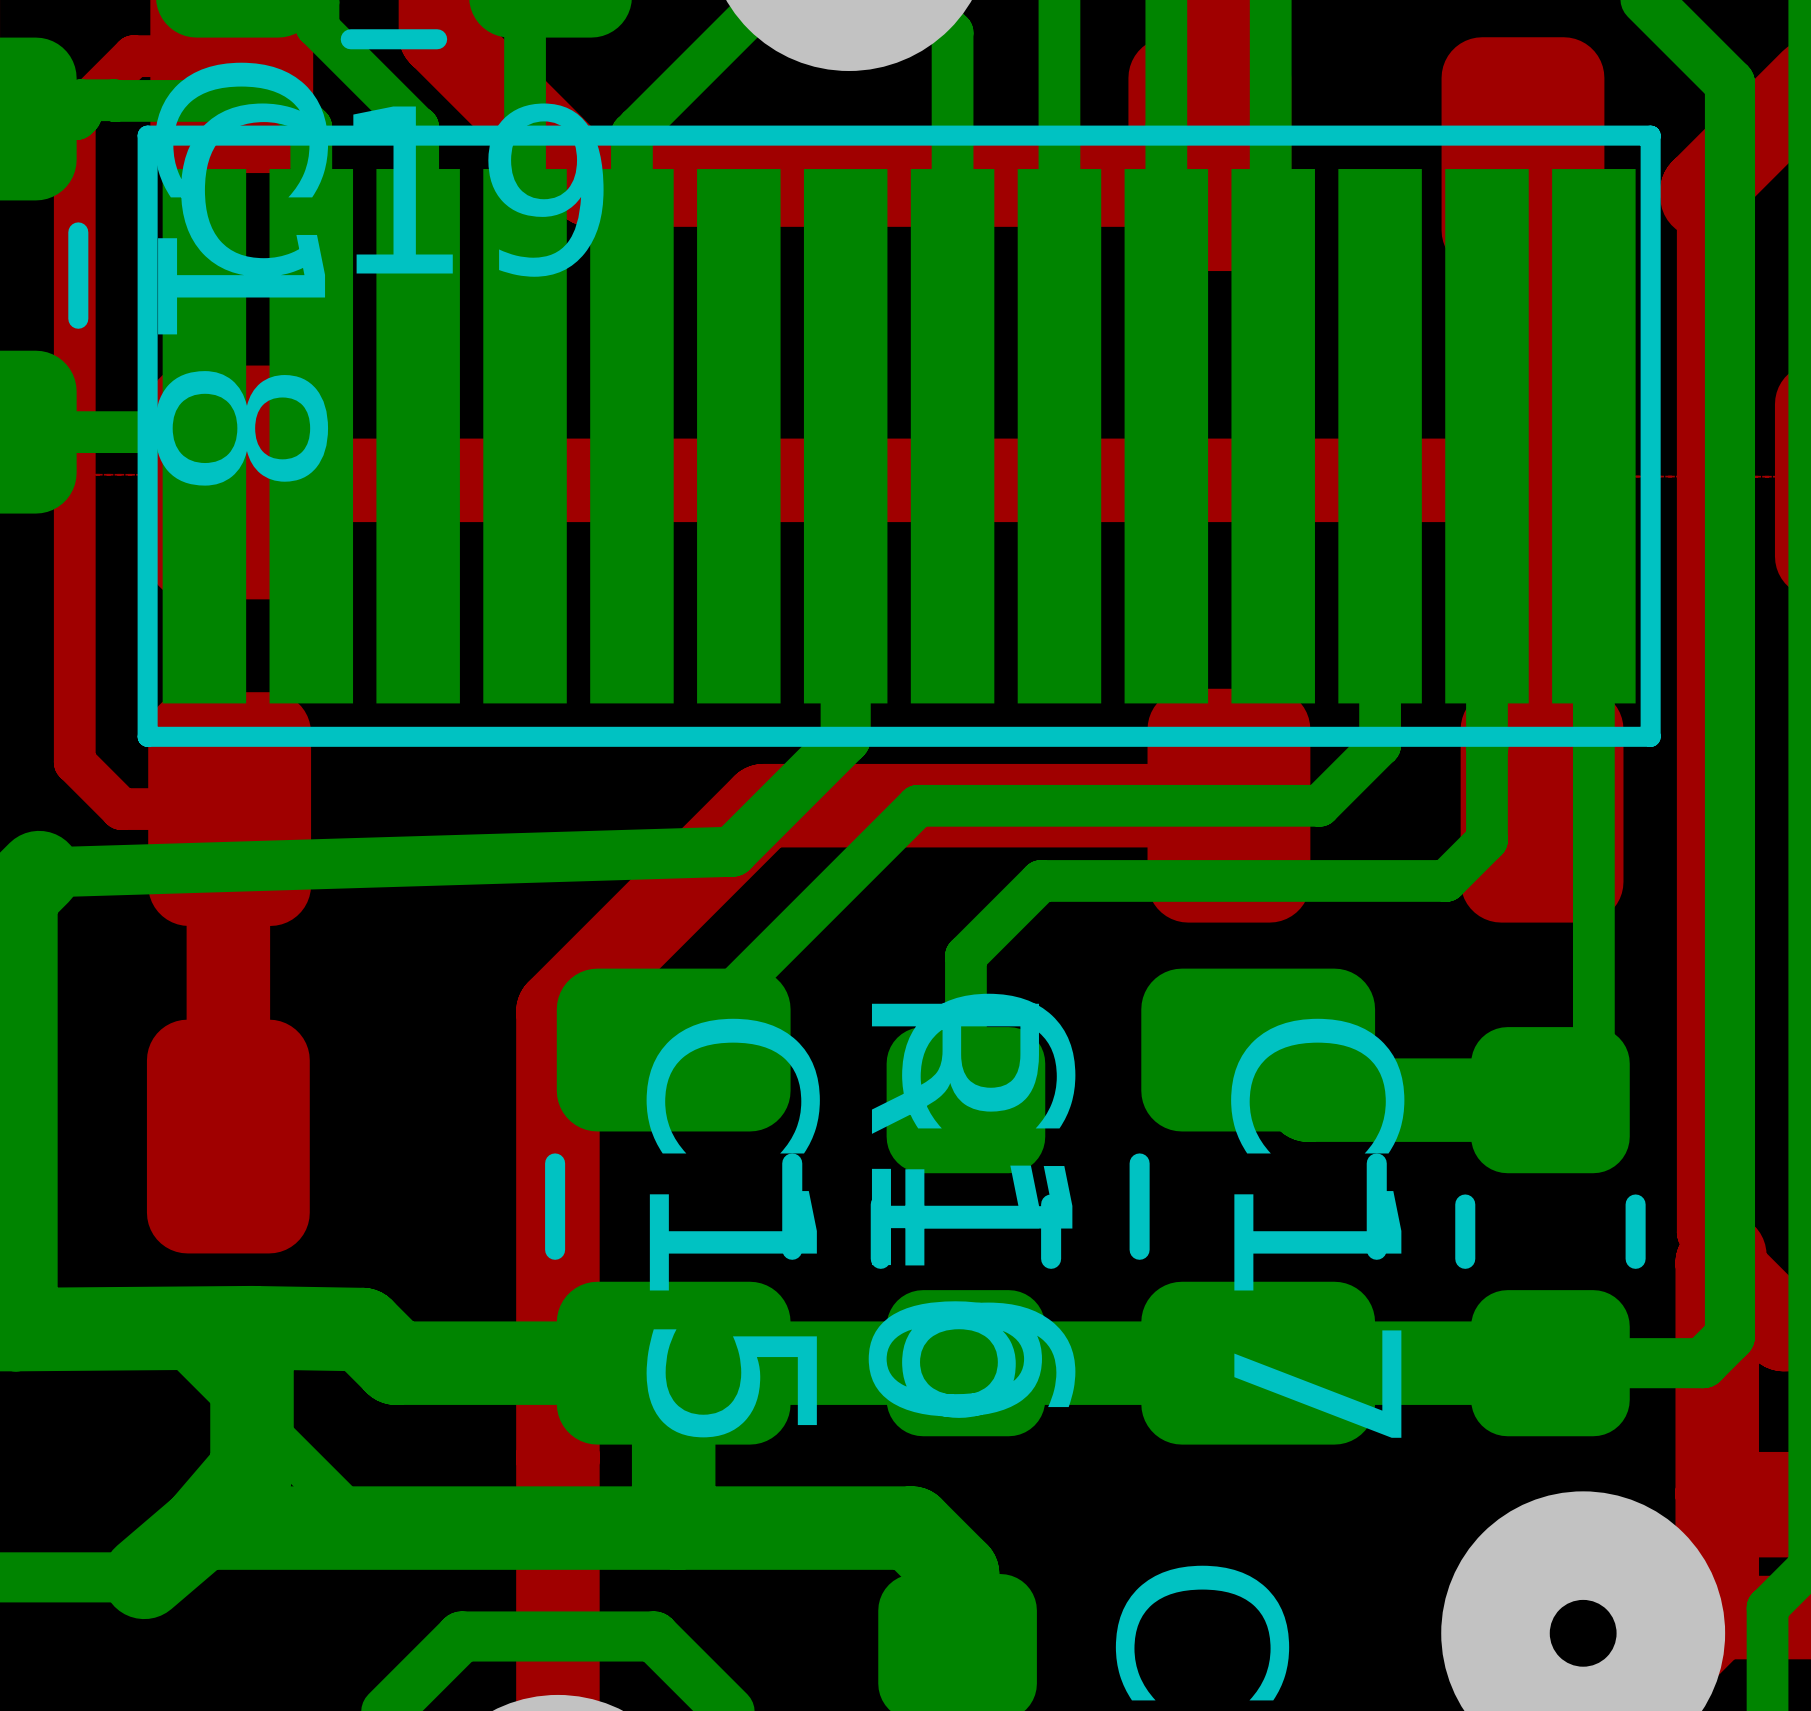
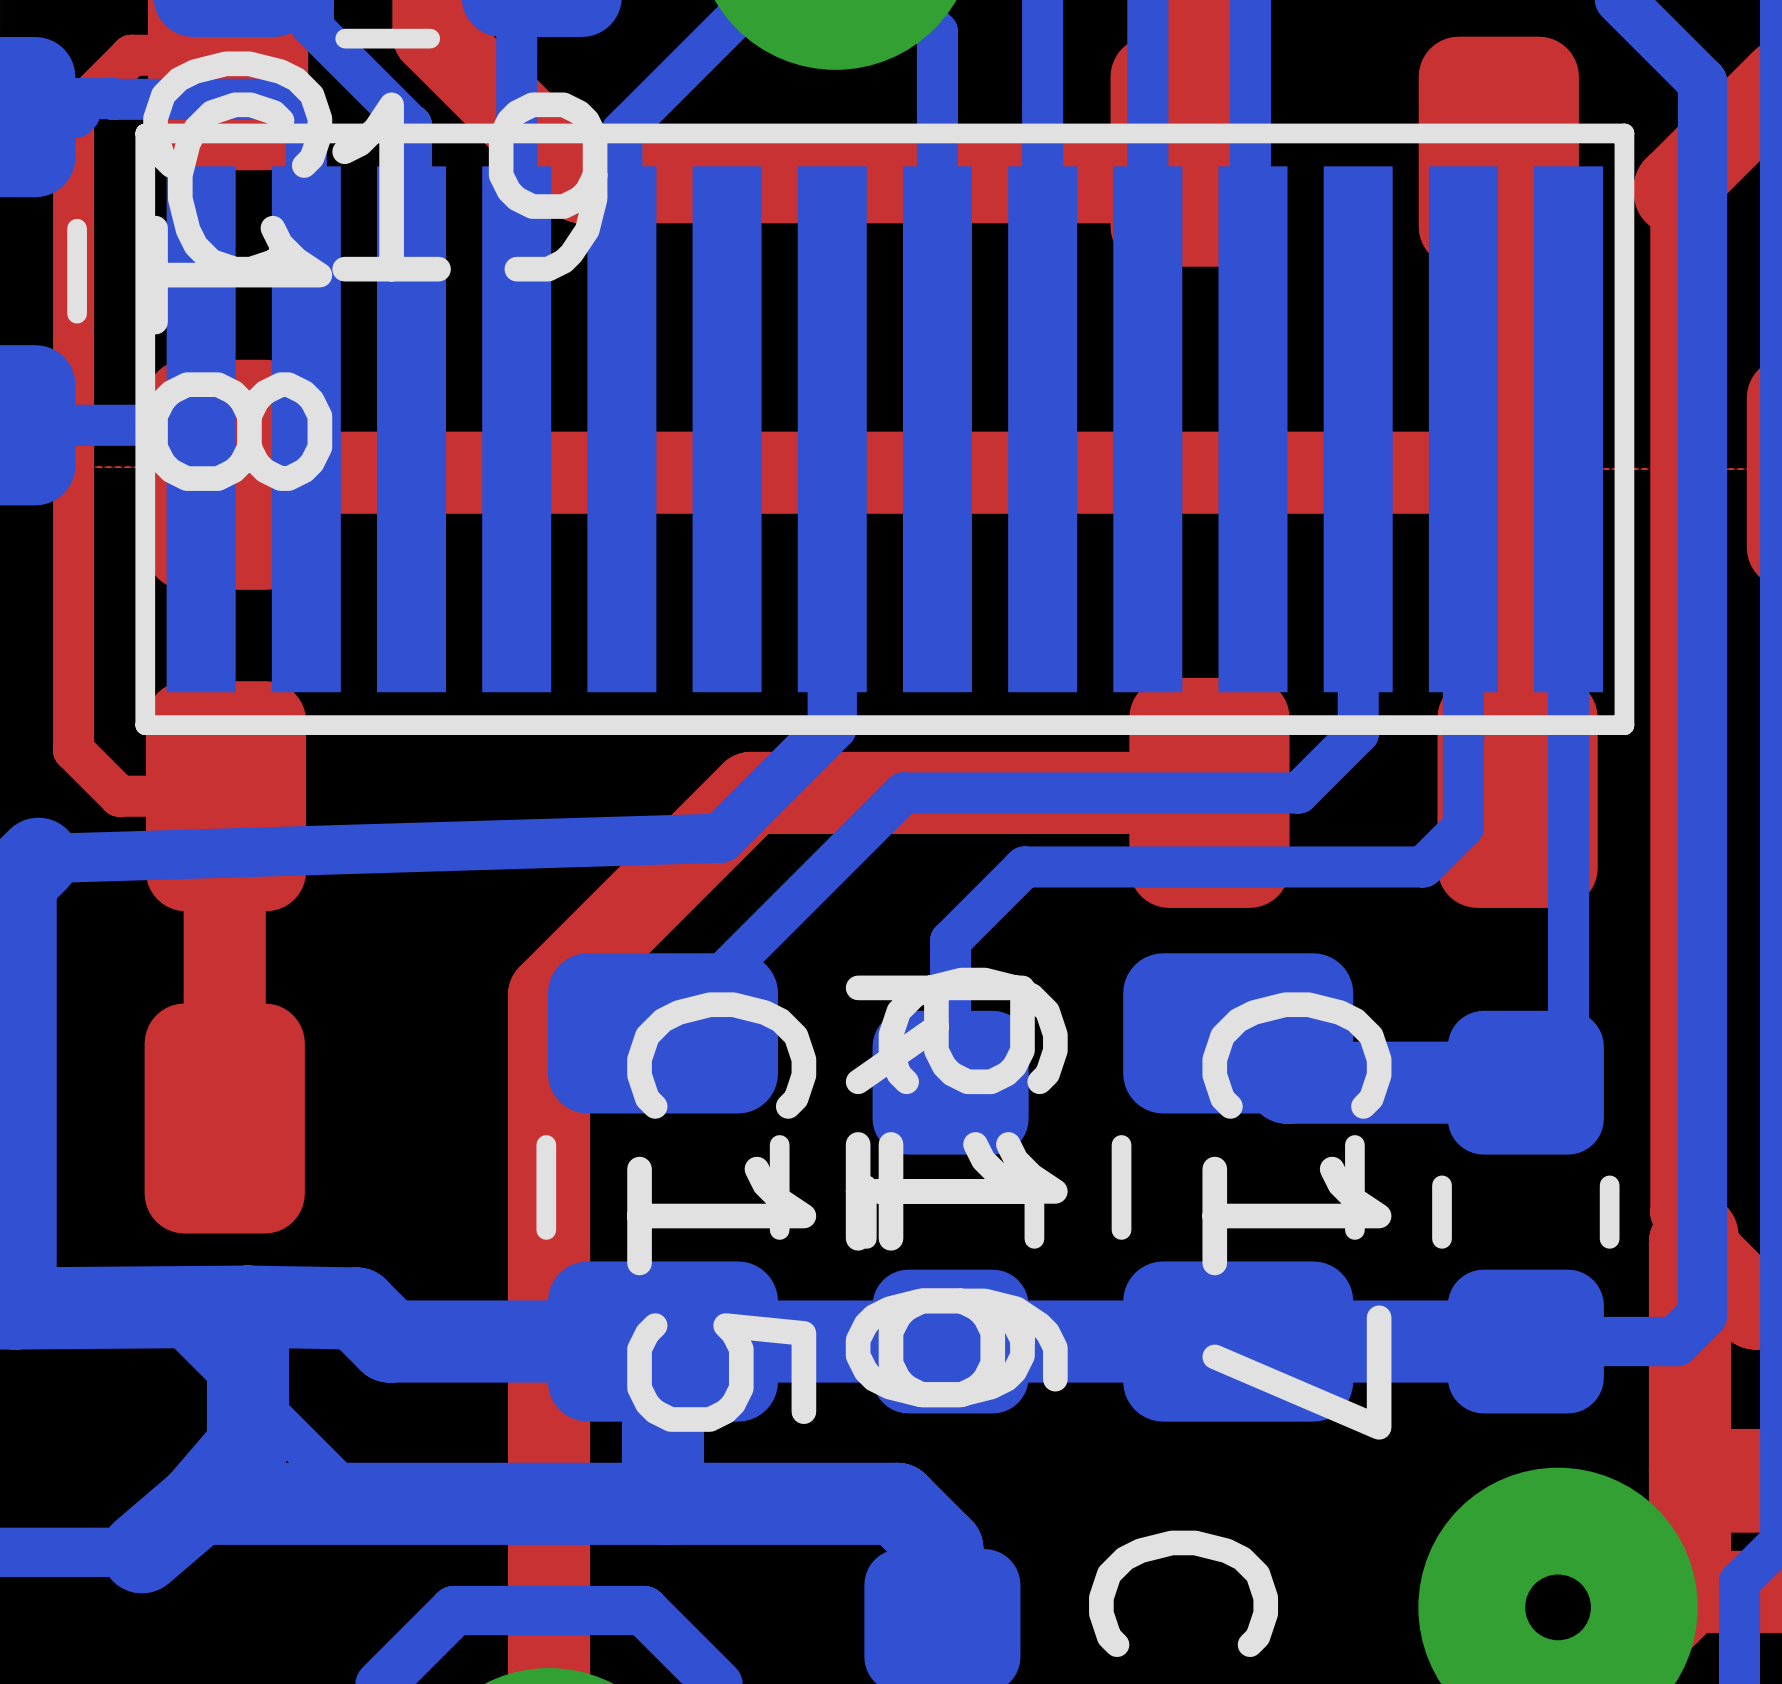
part footprint: [137, 125, 1661, 747] -> [135, 123, 1635, 735]

